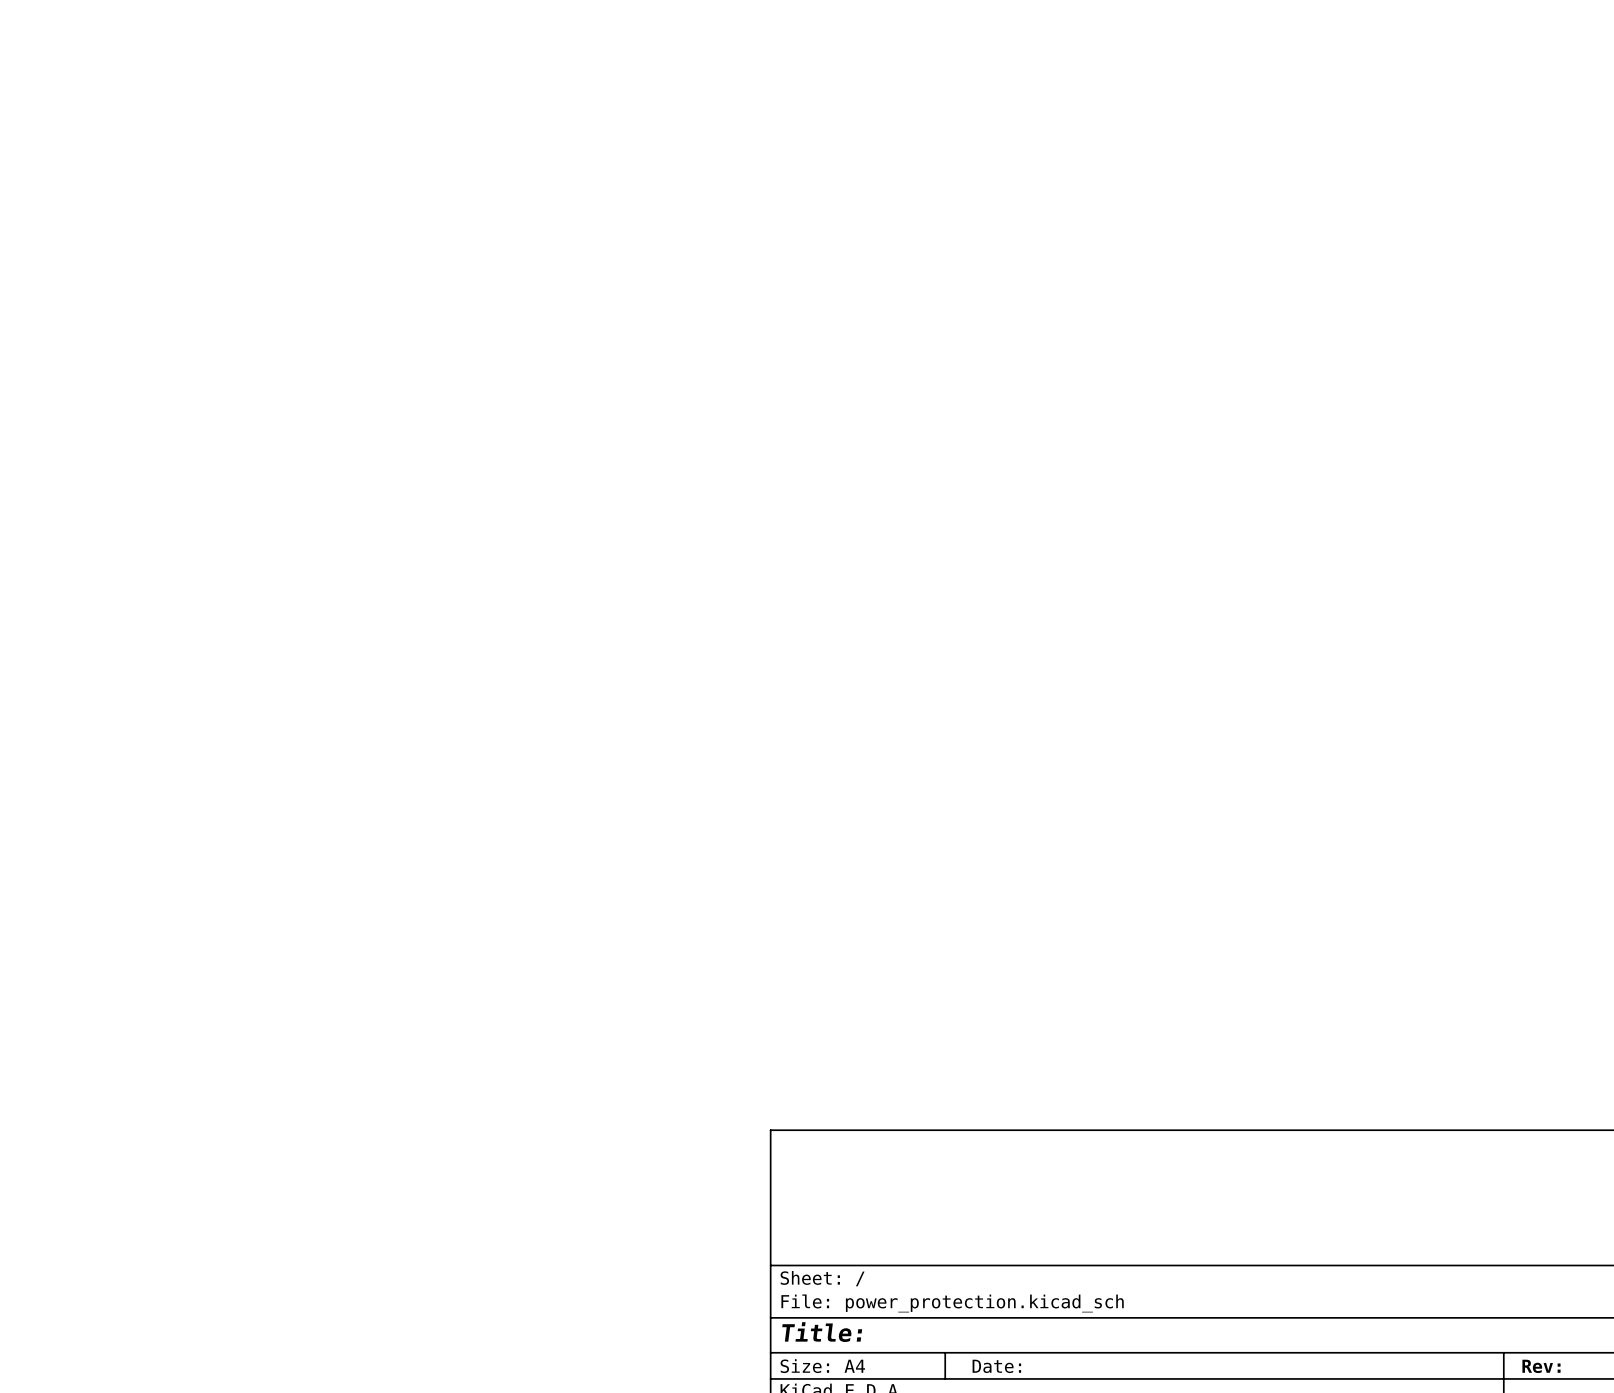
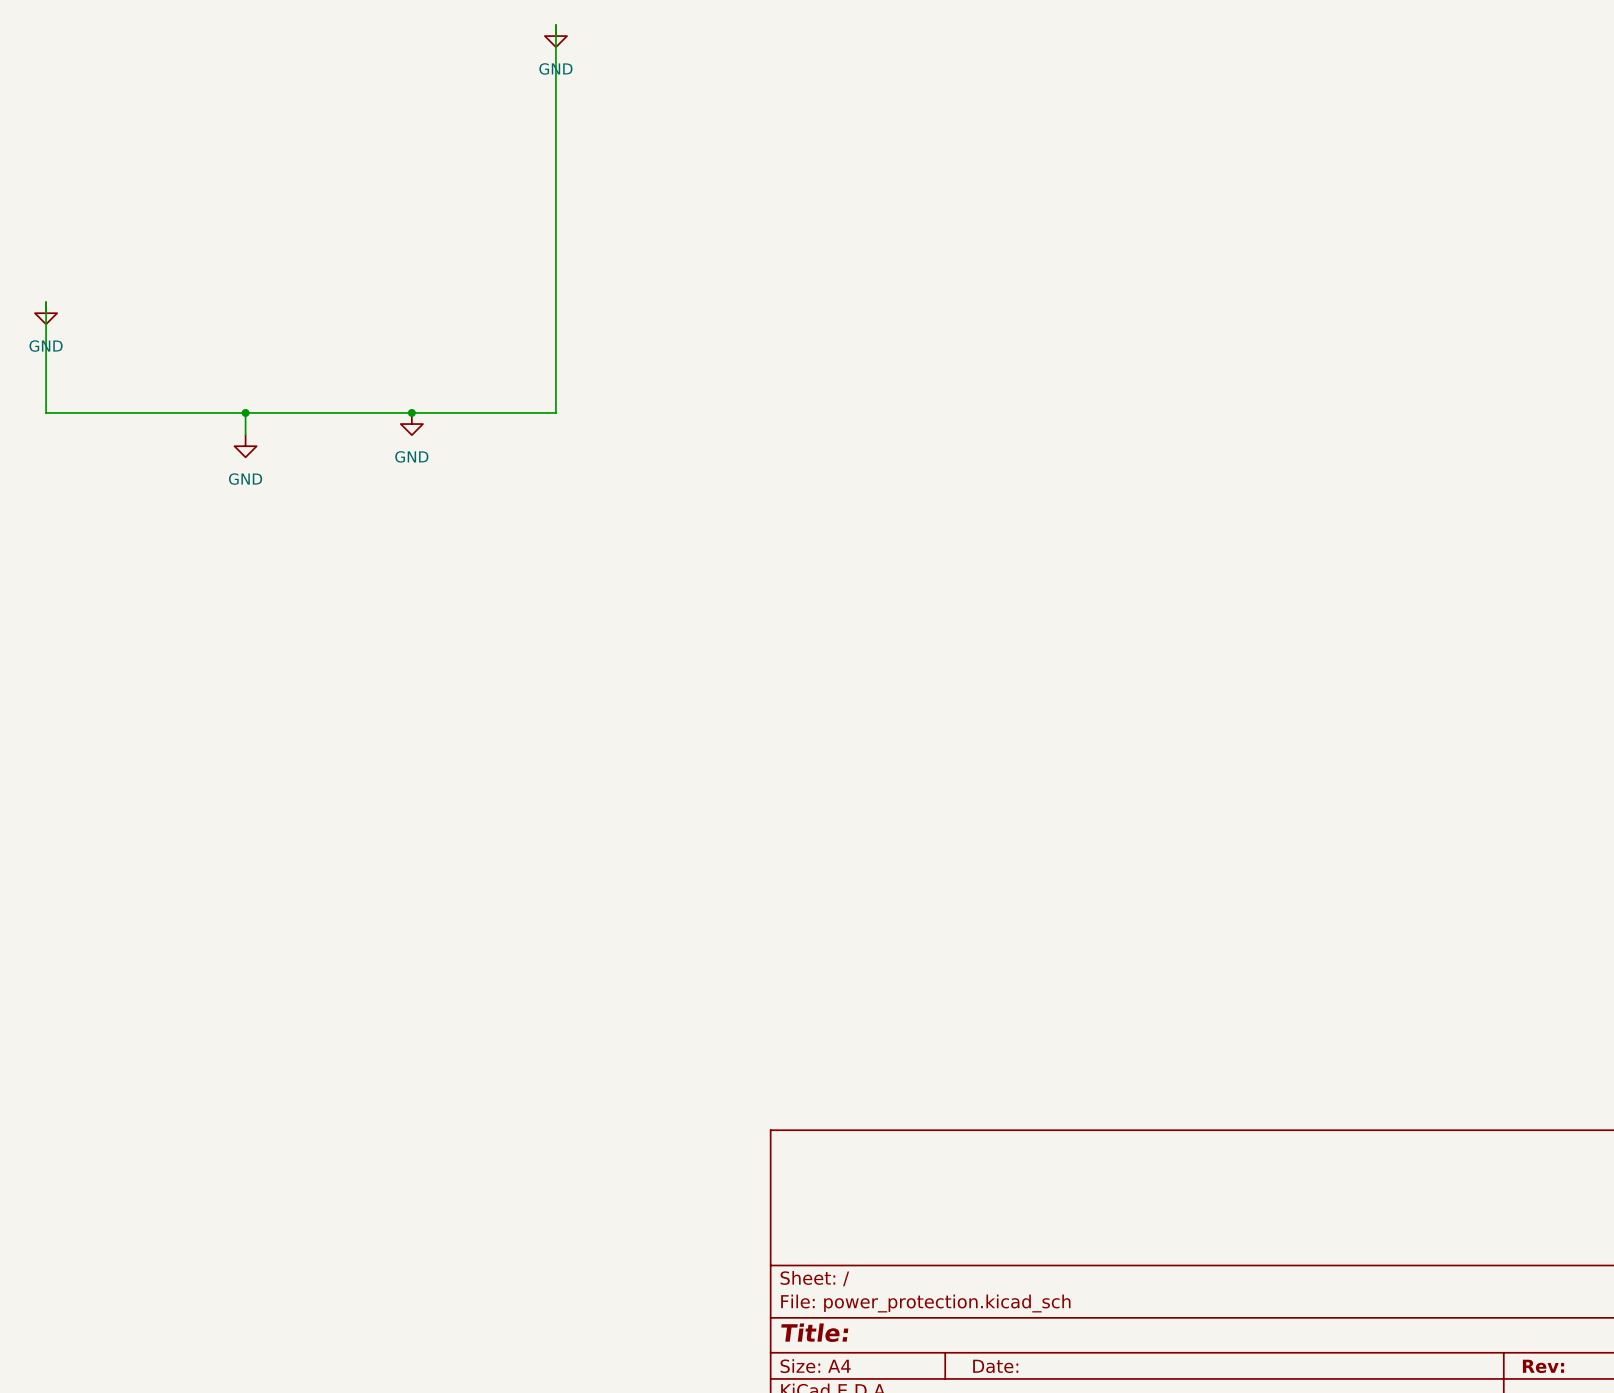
wire: none -> (555, 25) (555, 412) (46, 412) (46, 302)
power symbol: none -> GND (555, 36)
power symbol: none -> GND (46, 313)
wire: none -> (245, 412) (245, 435)
junction: none -> (245, 412)
junction: none -> (411, 412)
power symbol: none -> GND (411, 424)
power symbol: none -> GND (245, 446)

